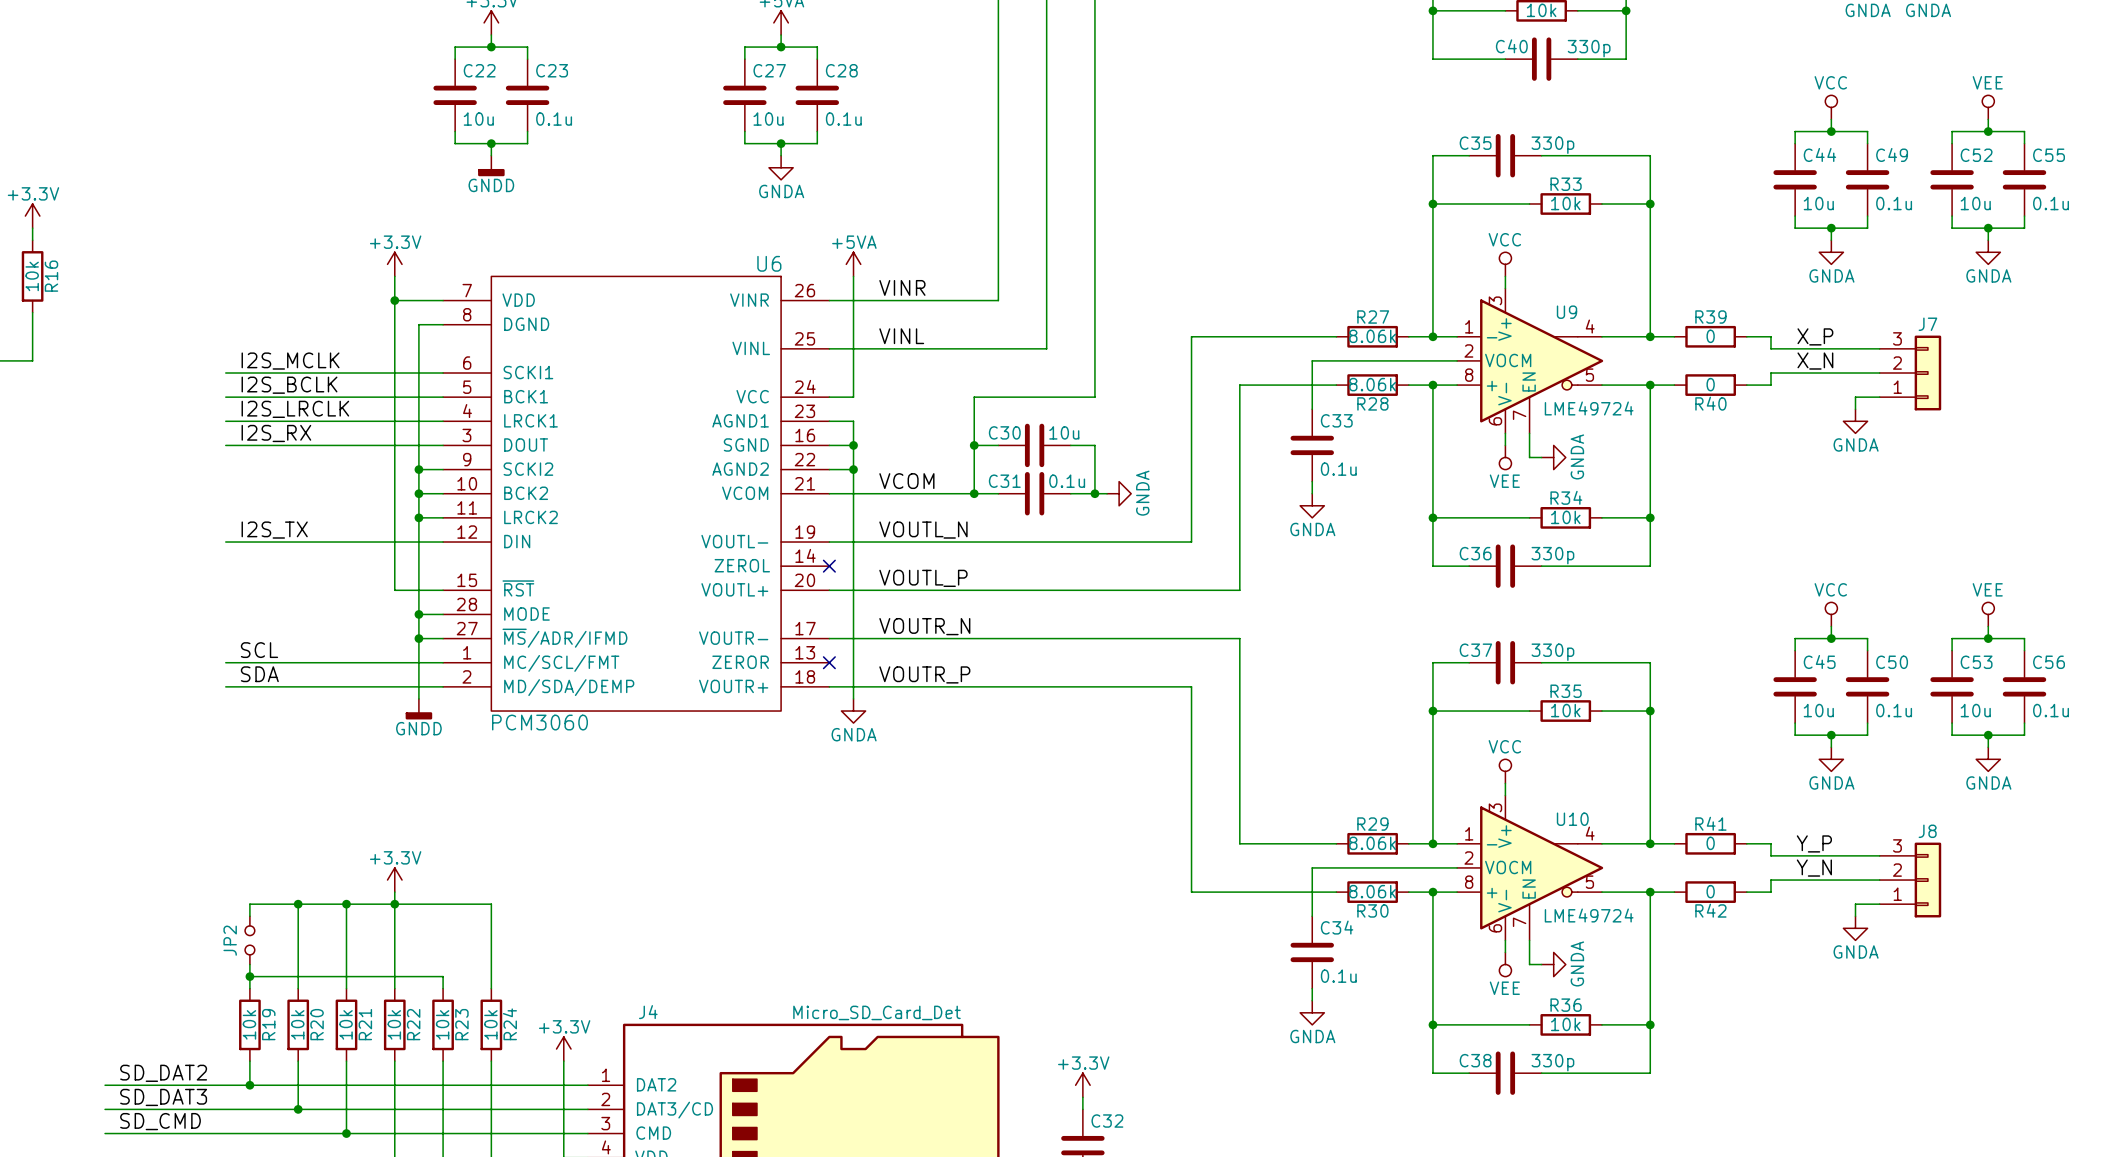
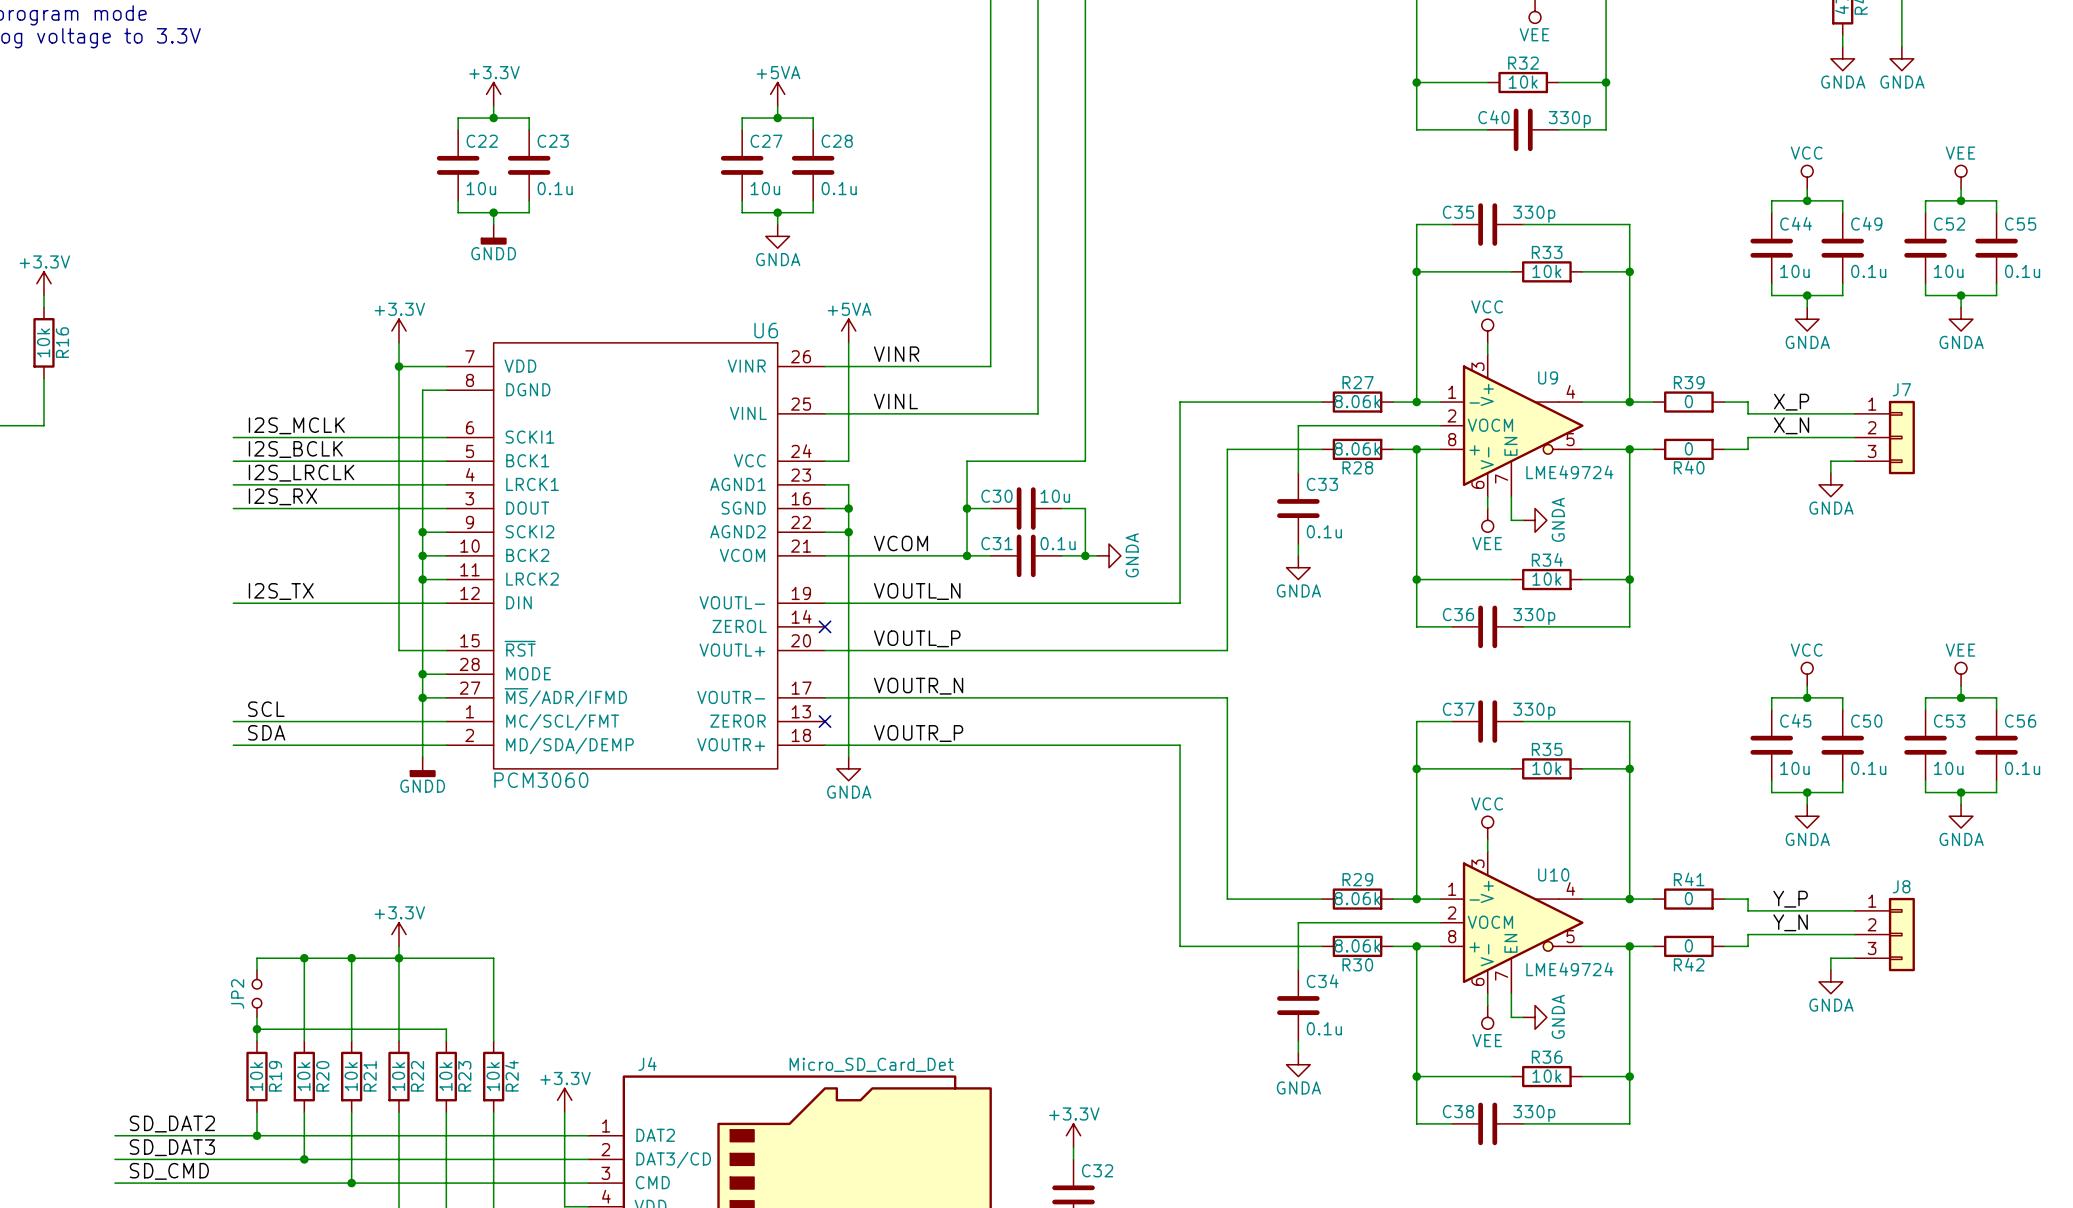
J7 flip: as is (1927, 373) -> up-down (1901, 437)
J8 flip: as is (1927, 880) -> up-down (1901, 934)

